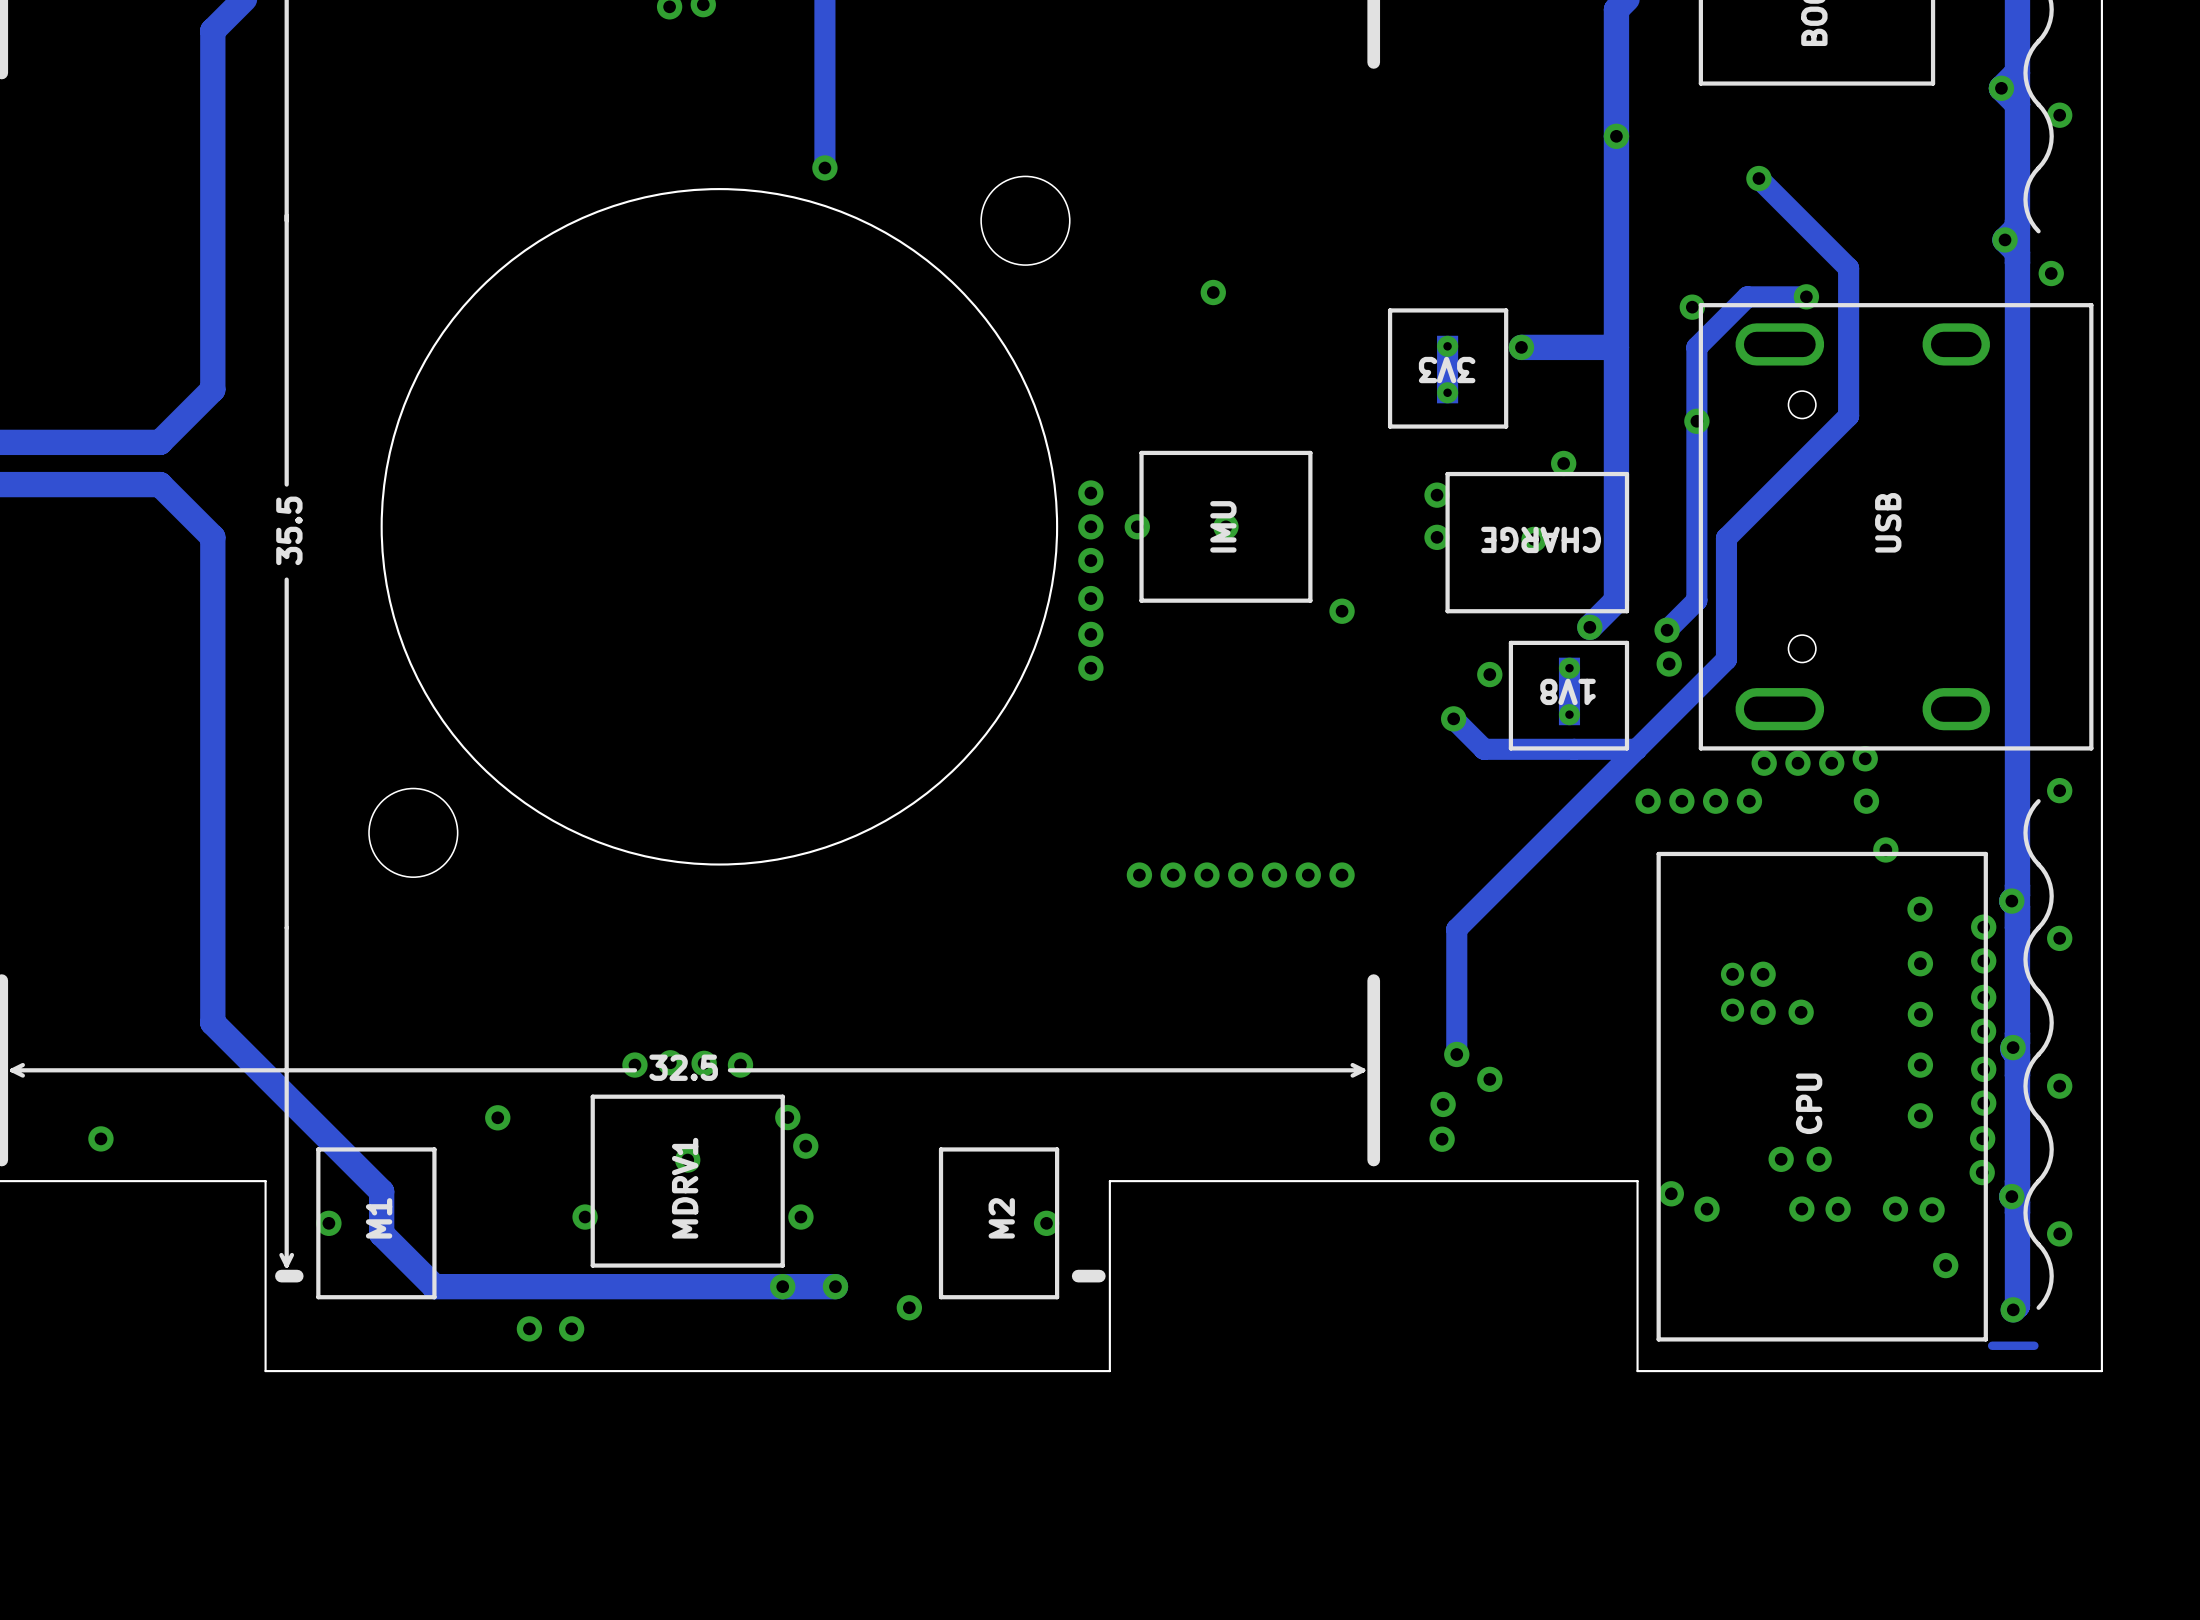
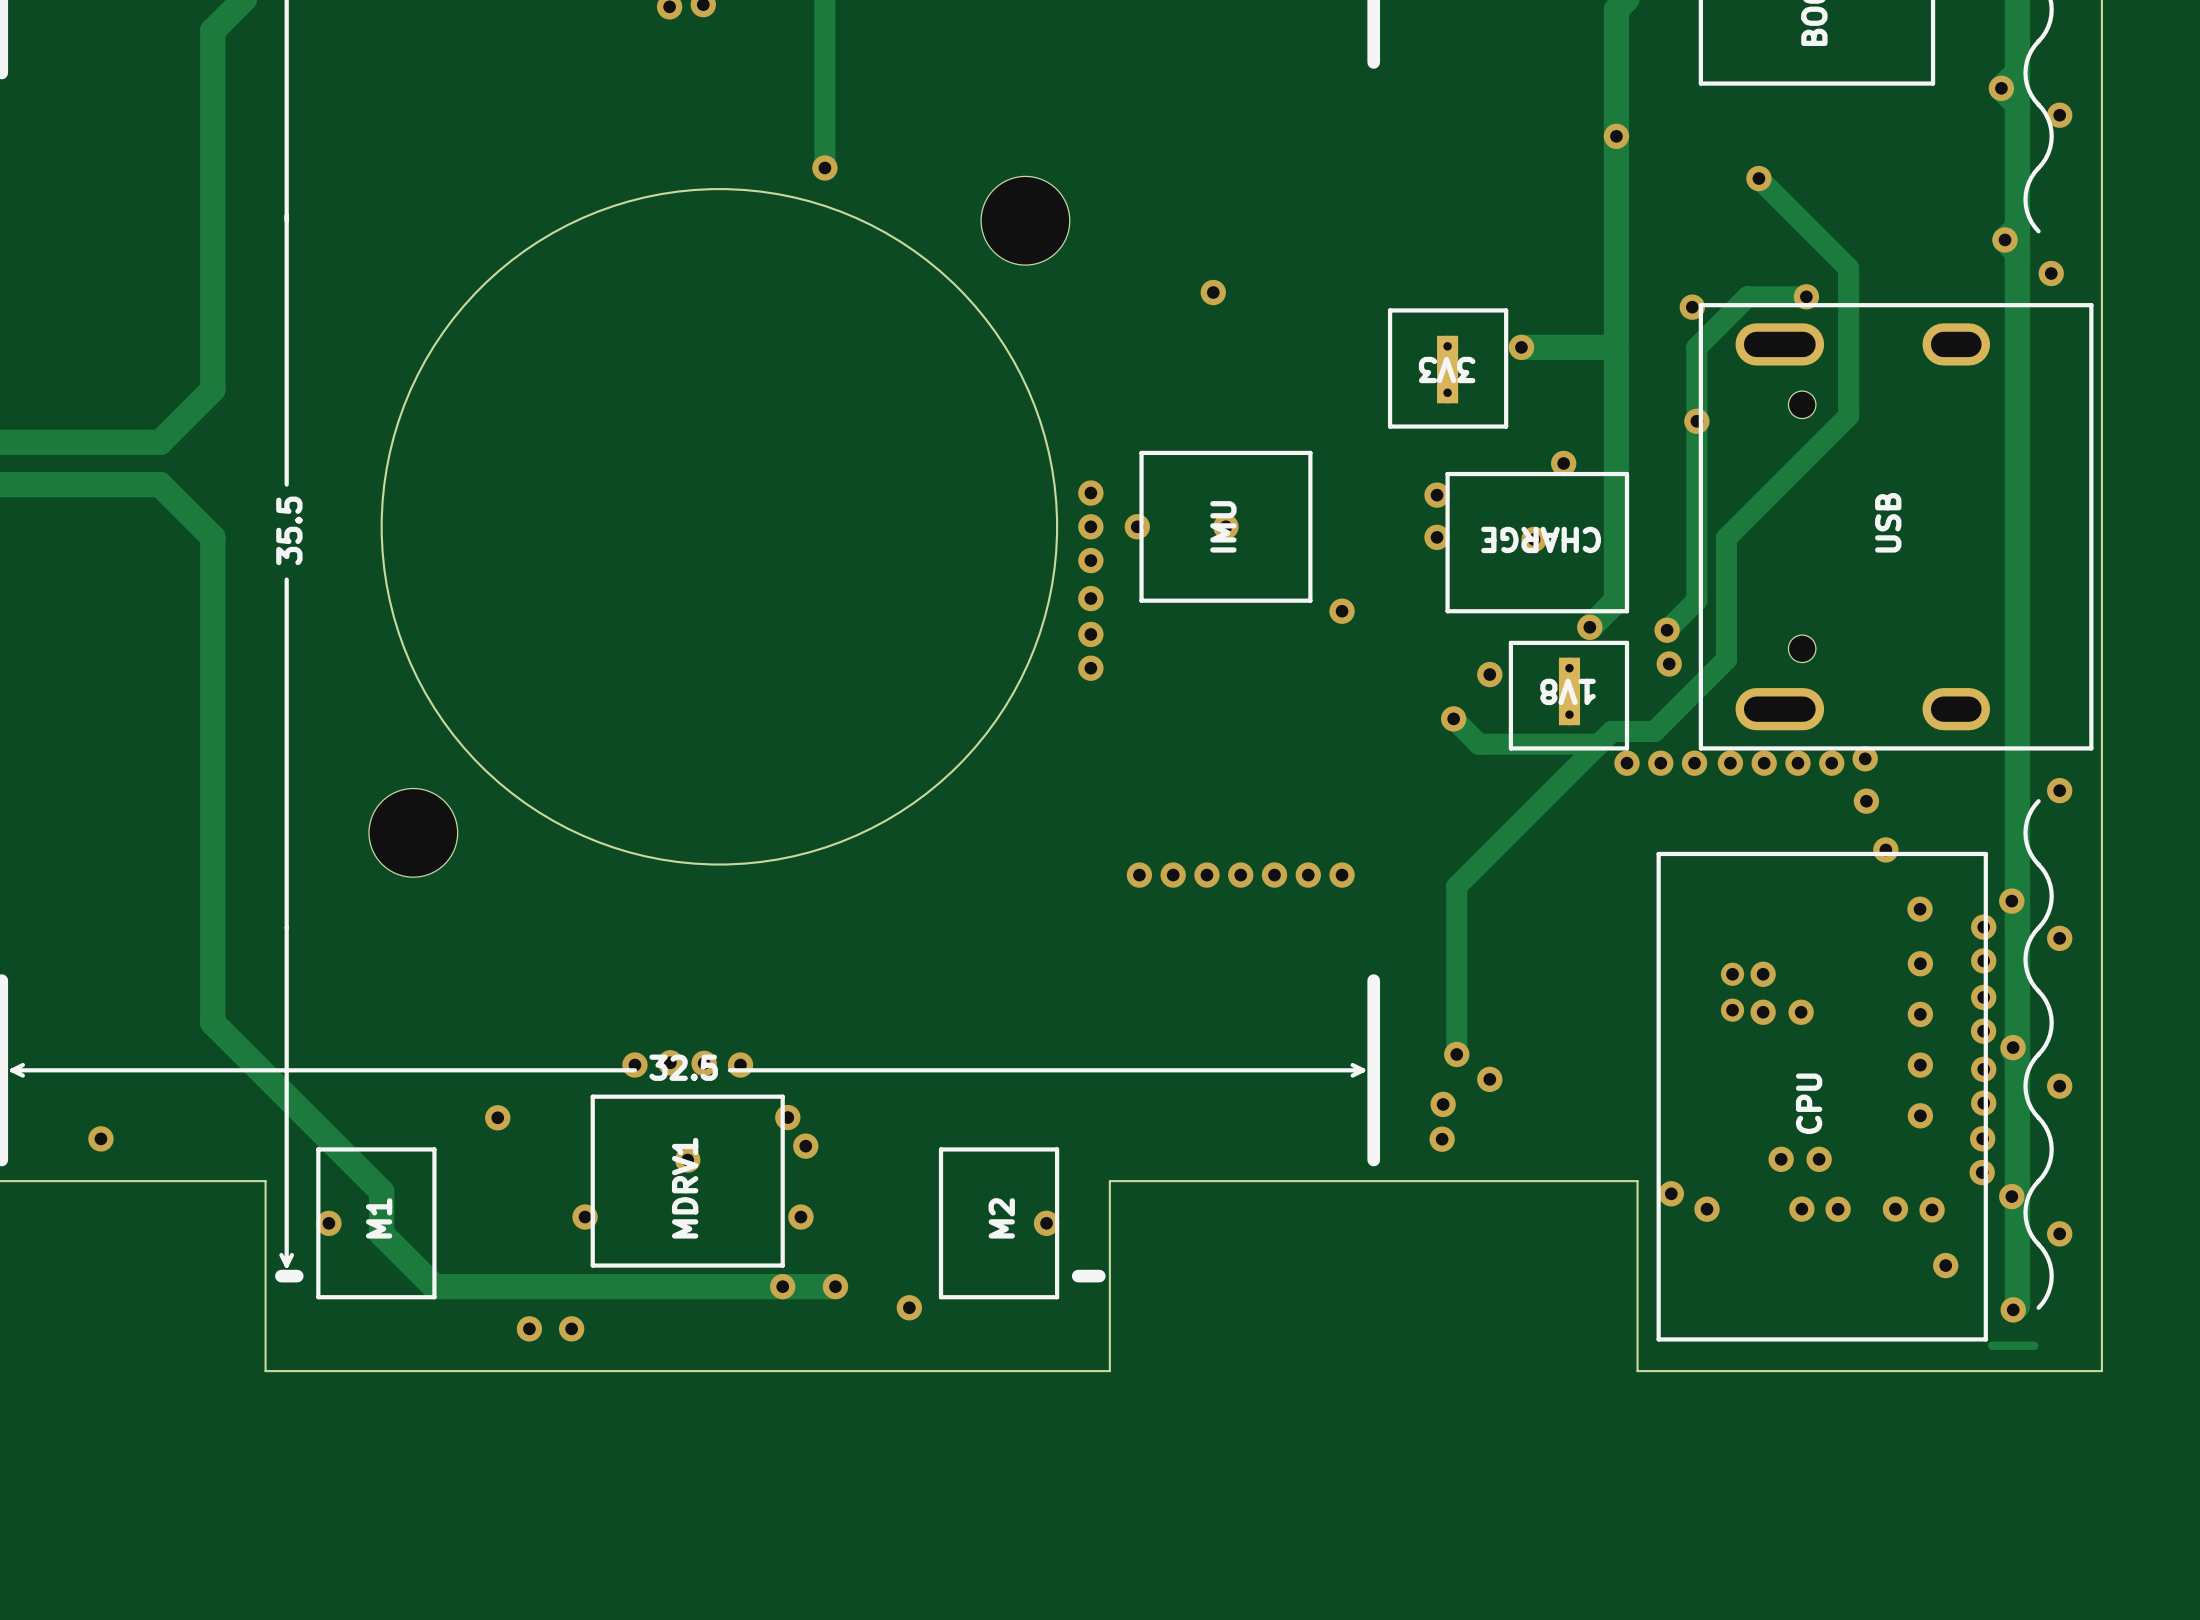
track: (1654, 731) (1456, 929) -> (1654, 731) (1611, 731) (1456, 886) (1456, 929)
track: (1479, 744) (1484, 749) (1636, 749) -> (1479, 744) (1599, 744)
via: none -> (1627, 763)
via: none -> (1660, 763)
via: none -> (1694, 763)
via: none -> (1730, 763)
via: (1648, 801) -> none
via: (1681, 801) -> none
via: (1715, 801) -> none
via: (1749, 801) -> none

